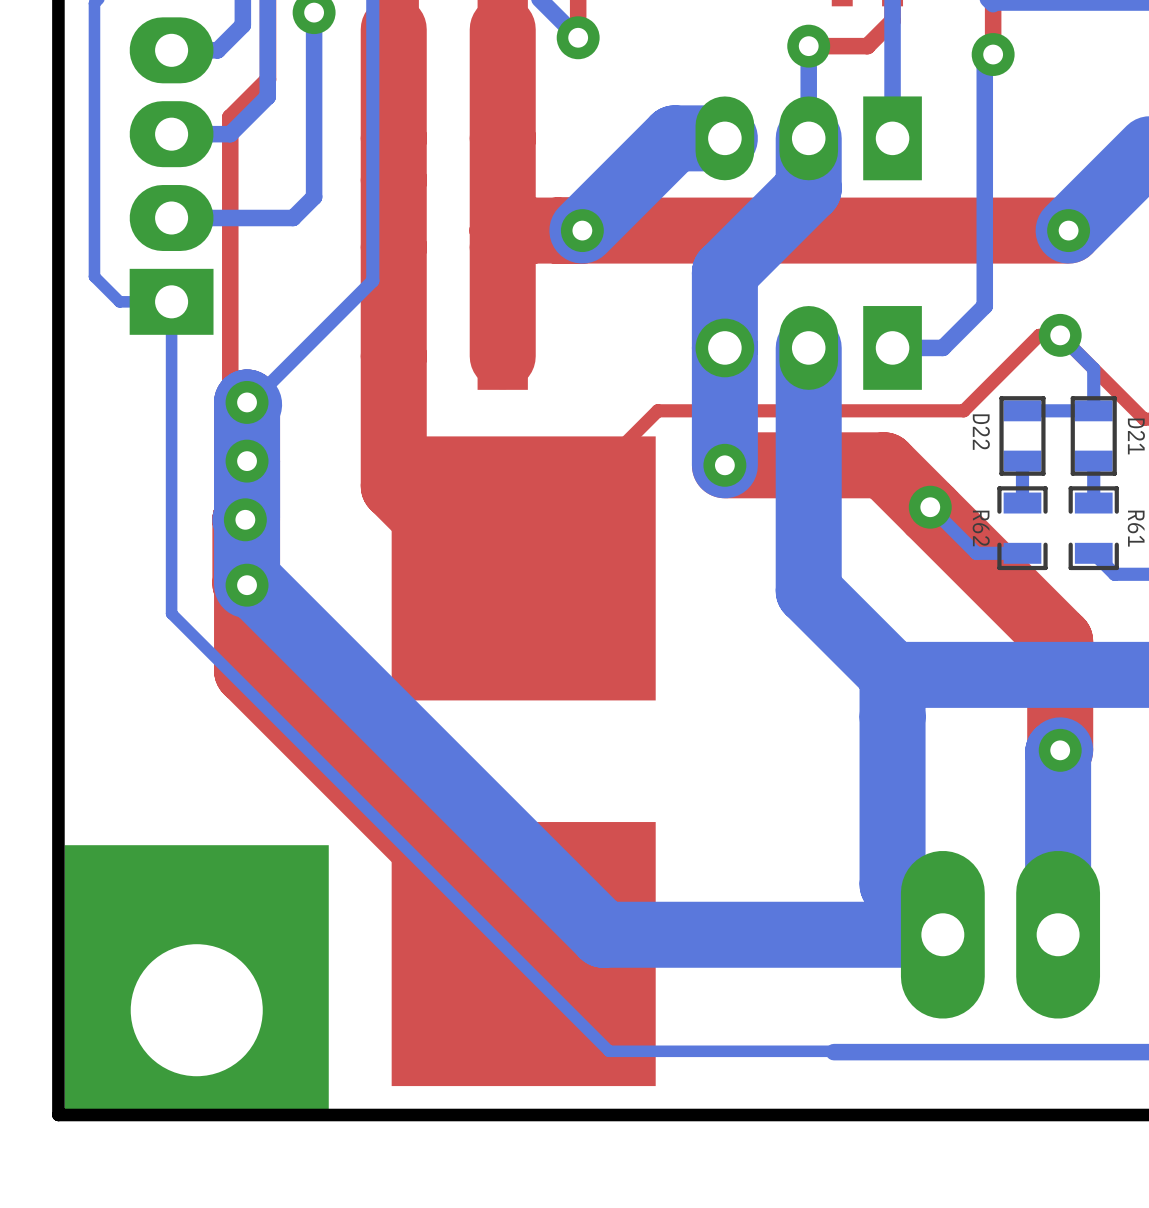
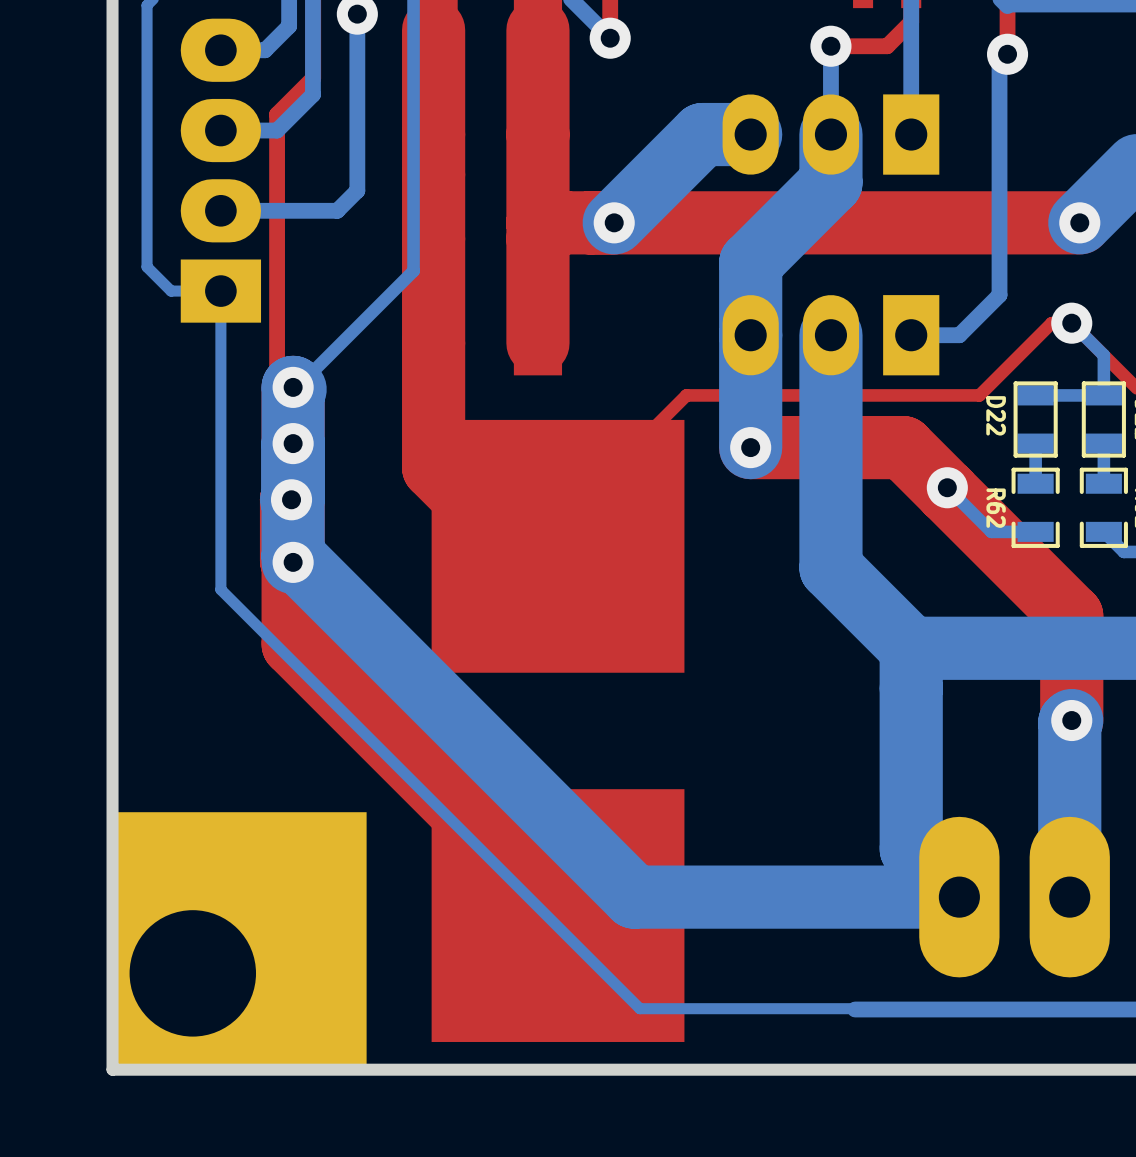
part footprint: [695, 306, 922, 390] -> [722, 295, 940, 376]
part footprint: [64, 845, 329, 1110] -> [113, 812, 367, 1066]

